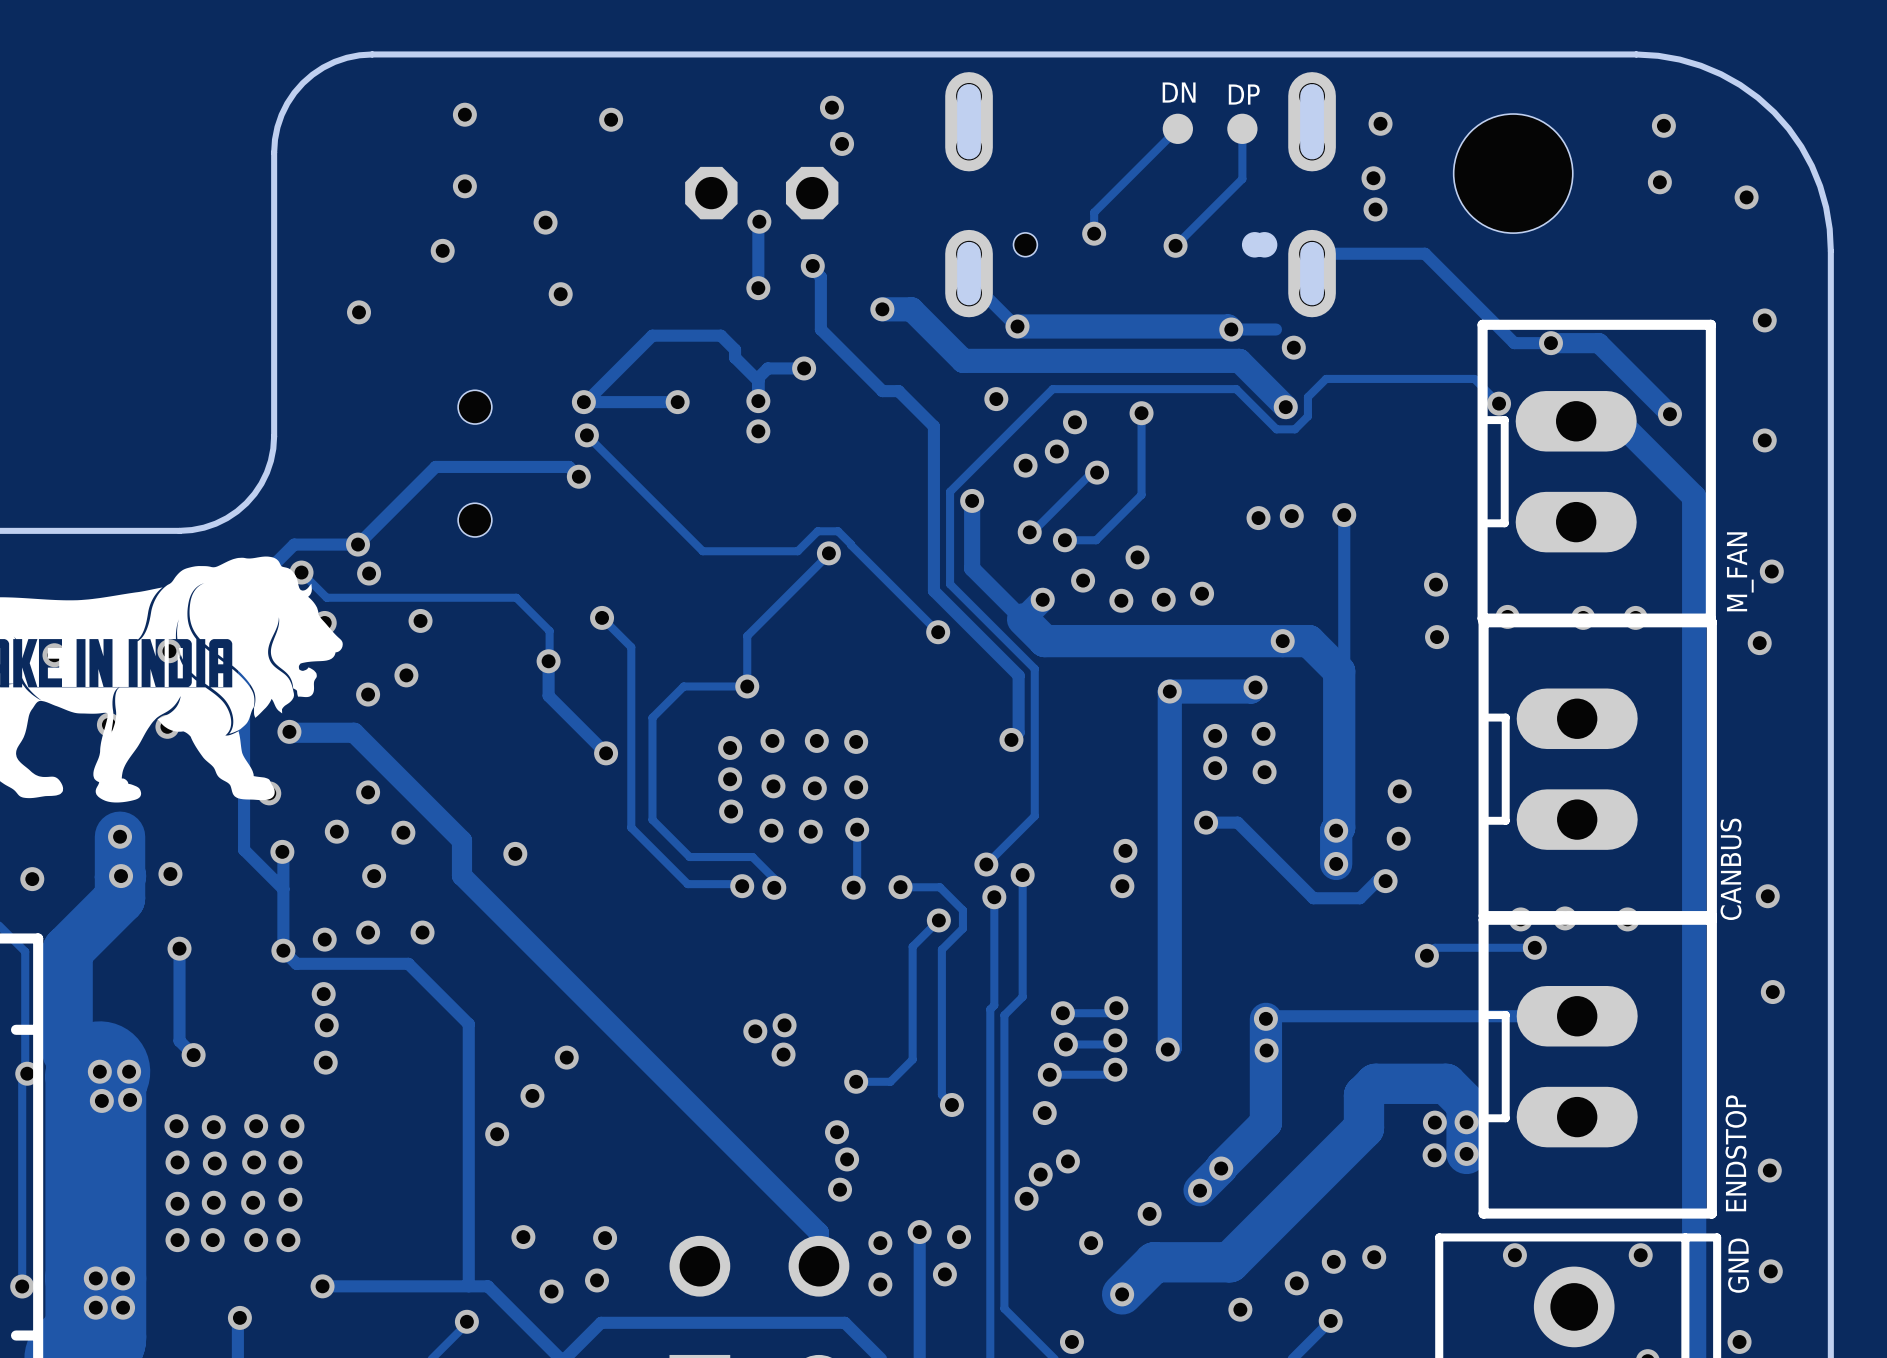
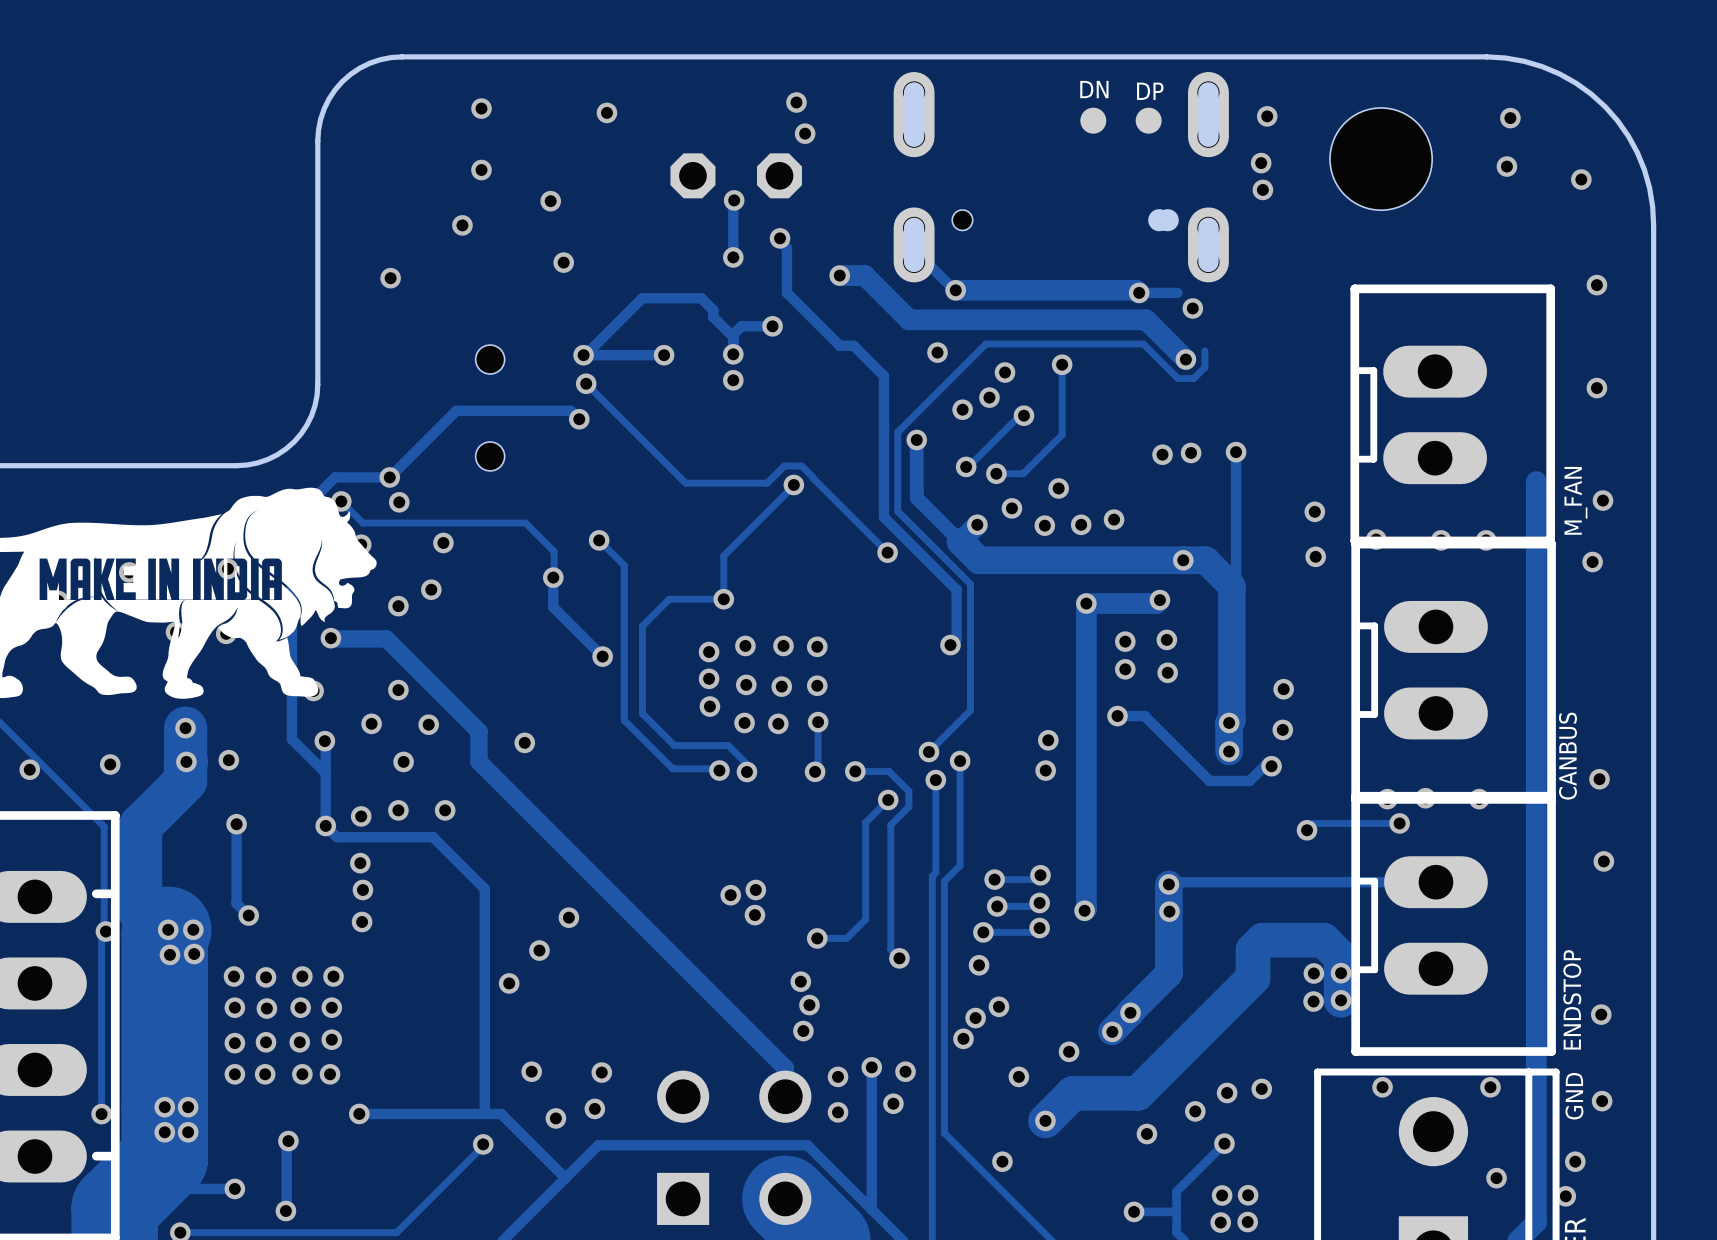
track: (1177, 128) (1094, 212) (1094, 233) -> none
track: (1242, 128) (1242, 178) (1175, 245) -> none
via: (1094, 233) -> none
via: (1175, 245) -> none
track: (1312, 253) (1424, 253) (1514, 343) (1598, 343) (1669, 414) -> none
via: (1550, 343) -> none
track: (1307, 397) (1326, 378) (1474, 378) (1499, 403) -> none
via: (1499, 403) -> none
via: (1669, 414) -> none
track: (1576, 421) (1618, 421) (1694, 496) (1694, 549) -> none

